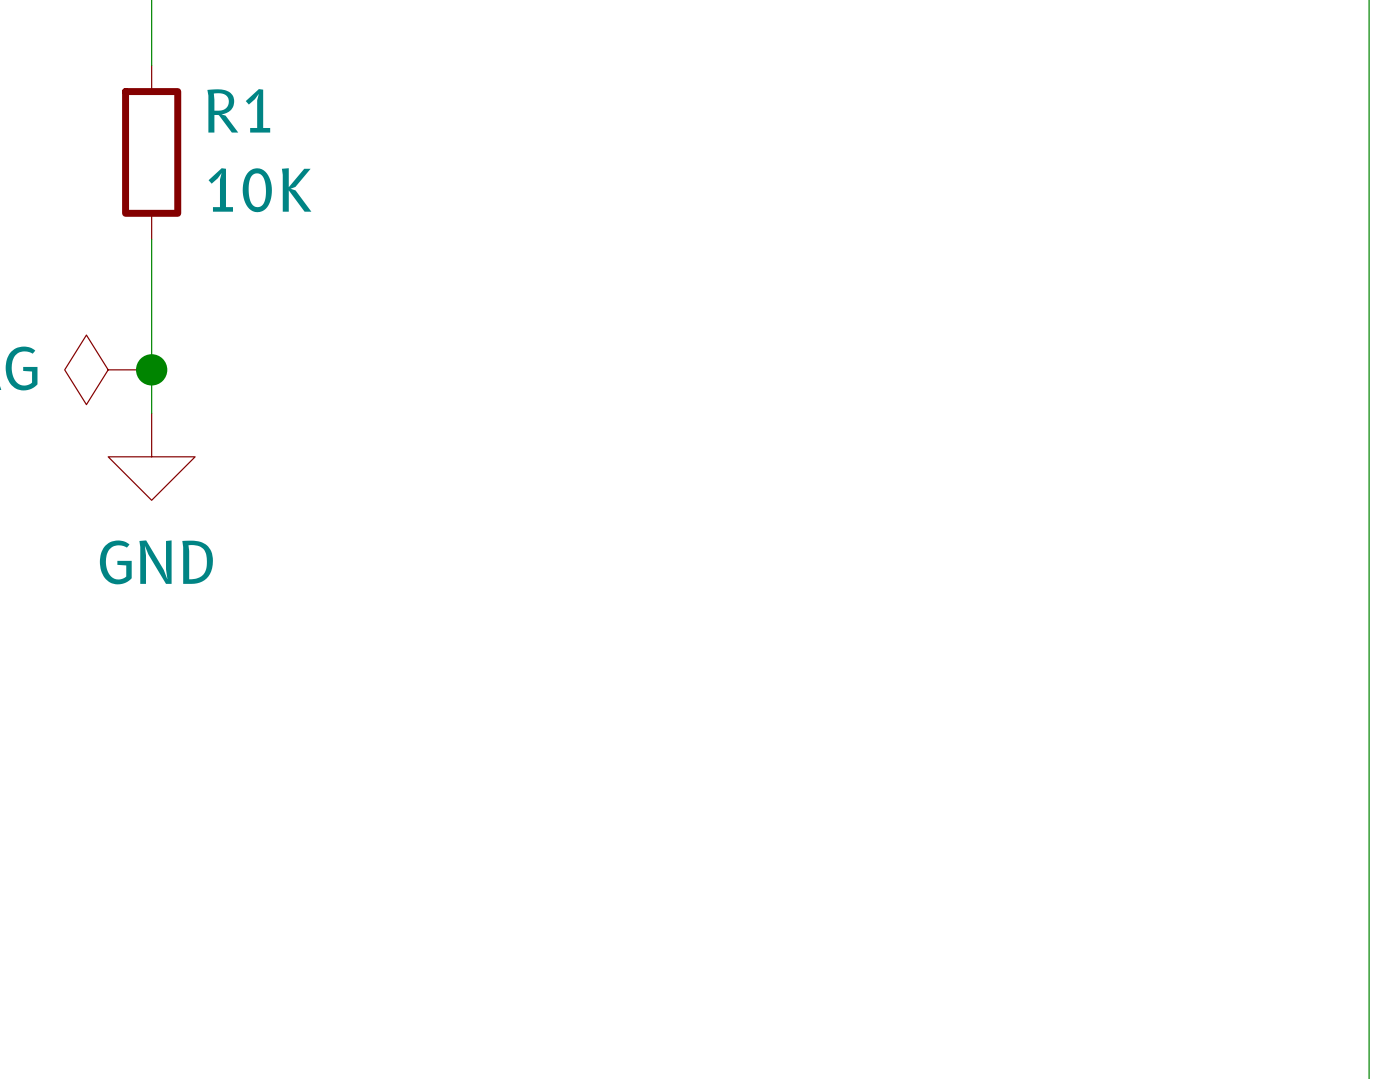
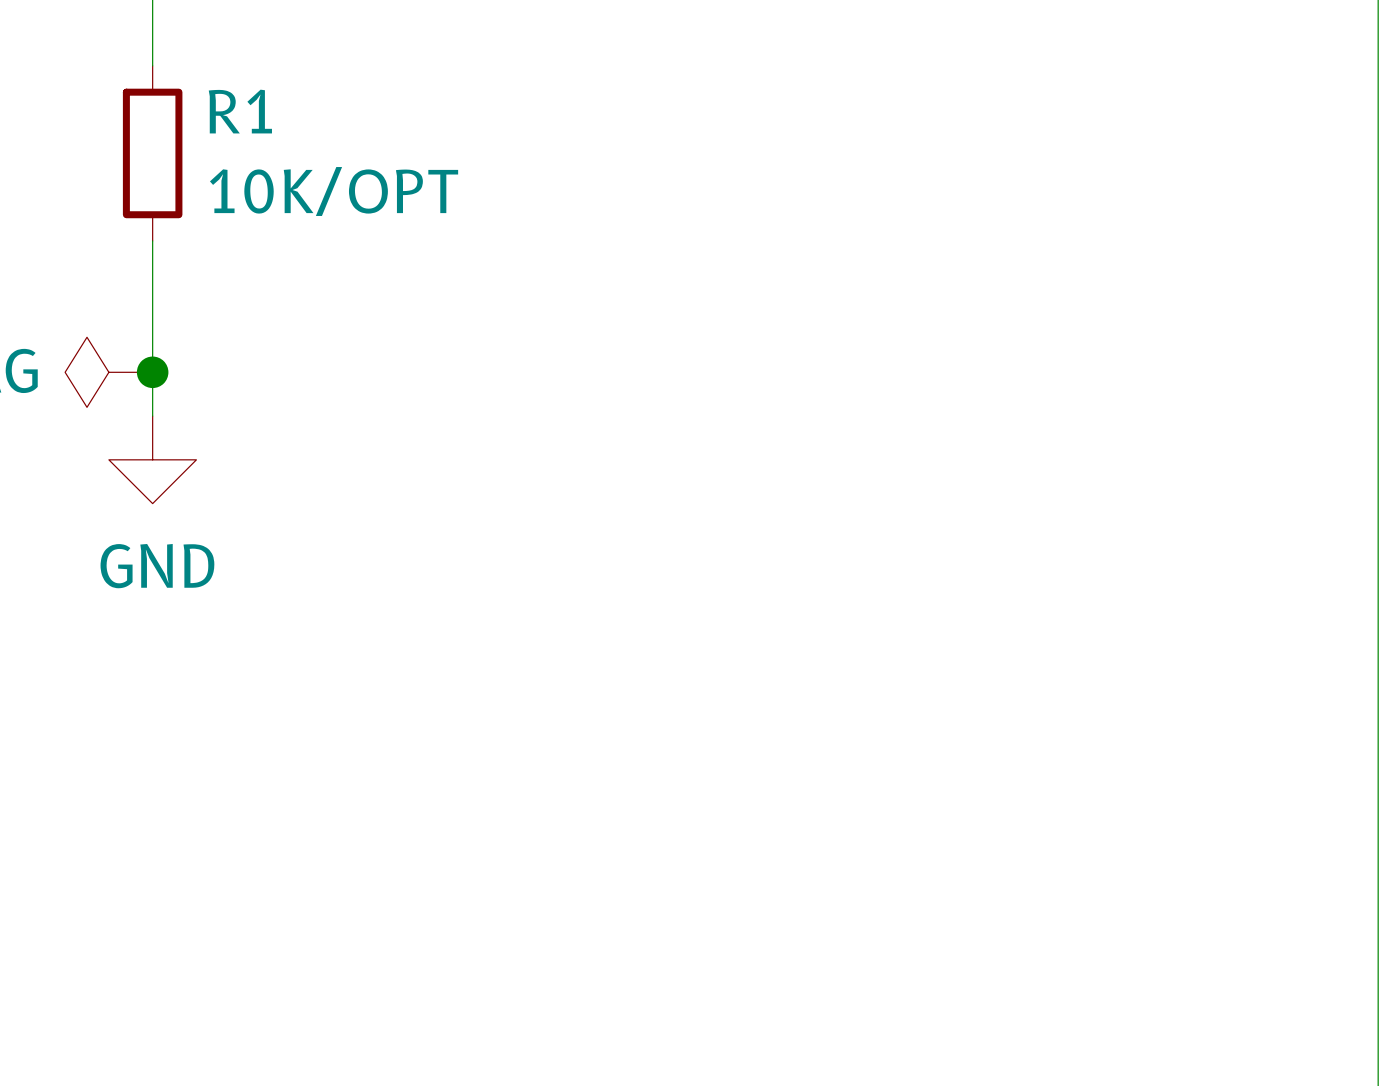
R1 value: 10K (259, 190) -> 10K/OPT (334, 191)

